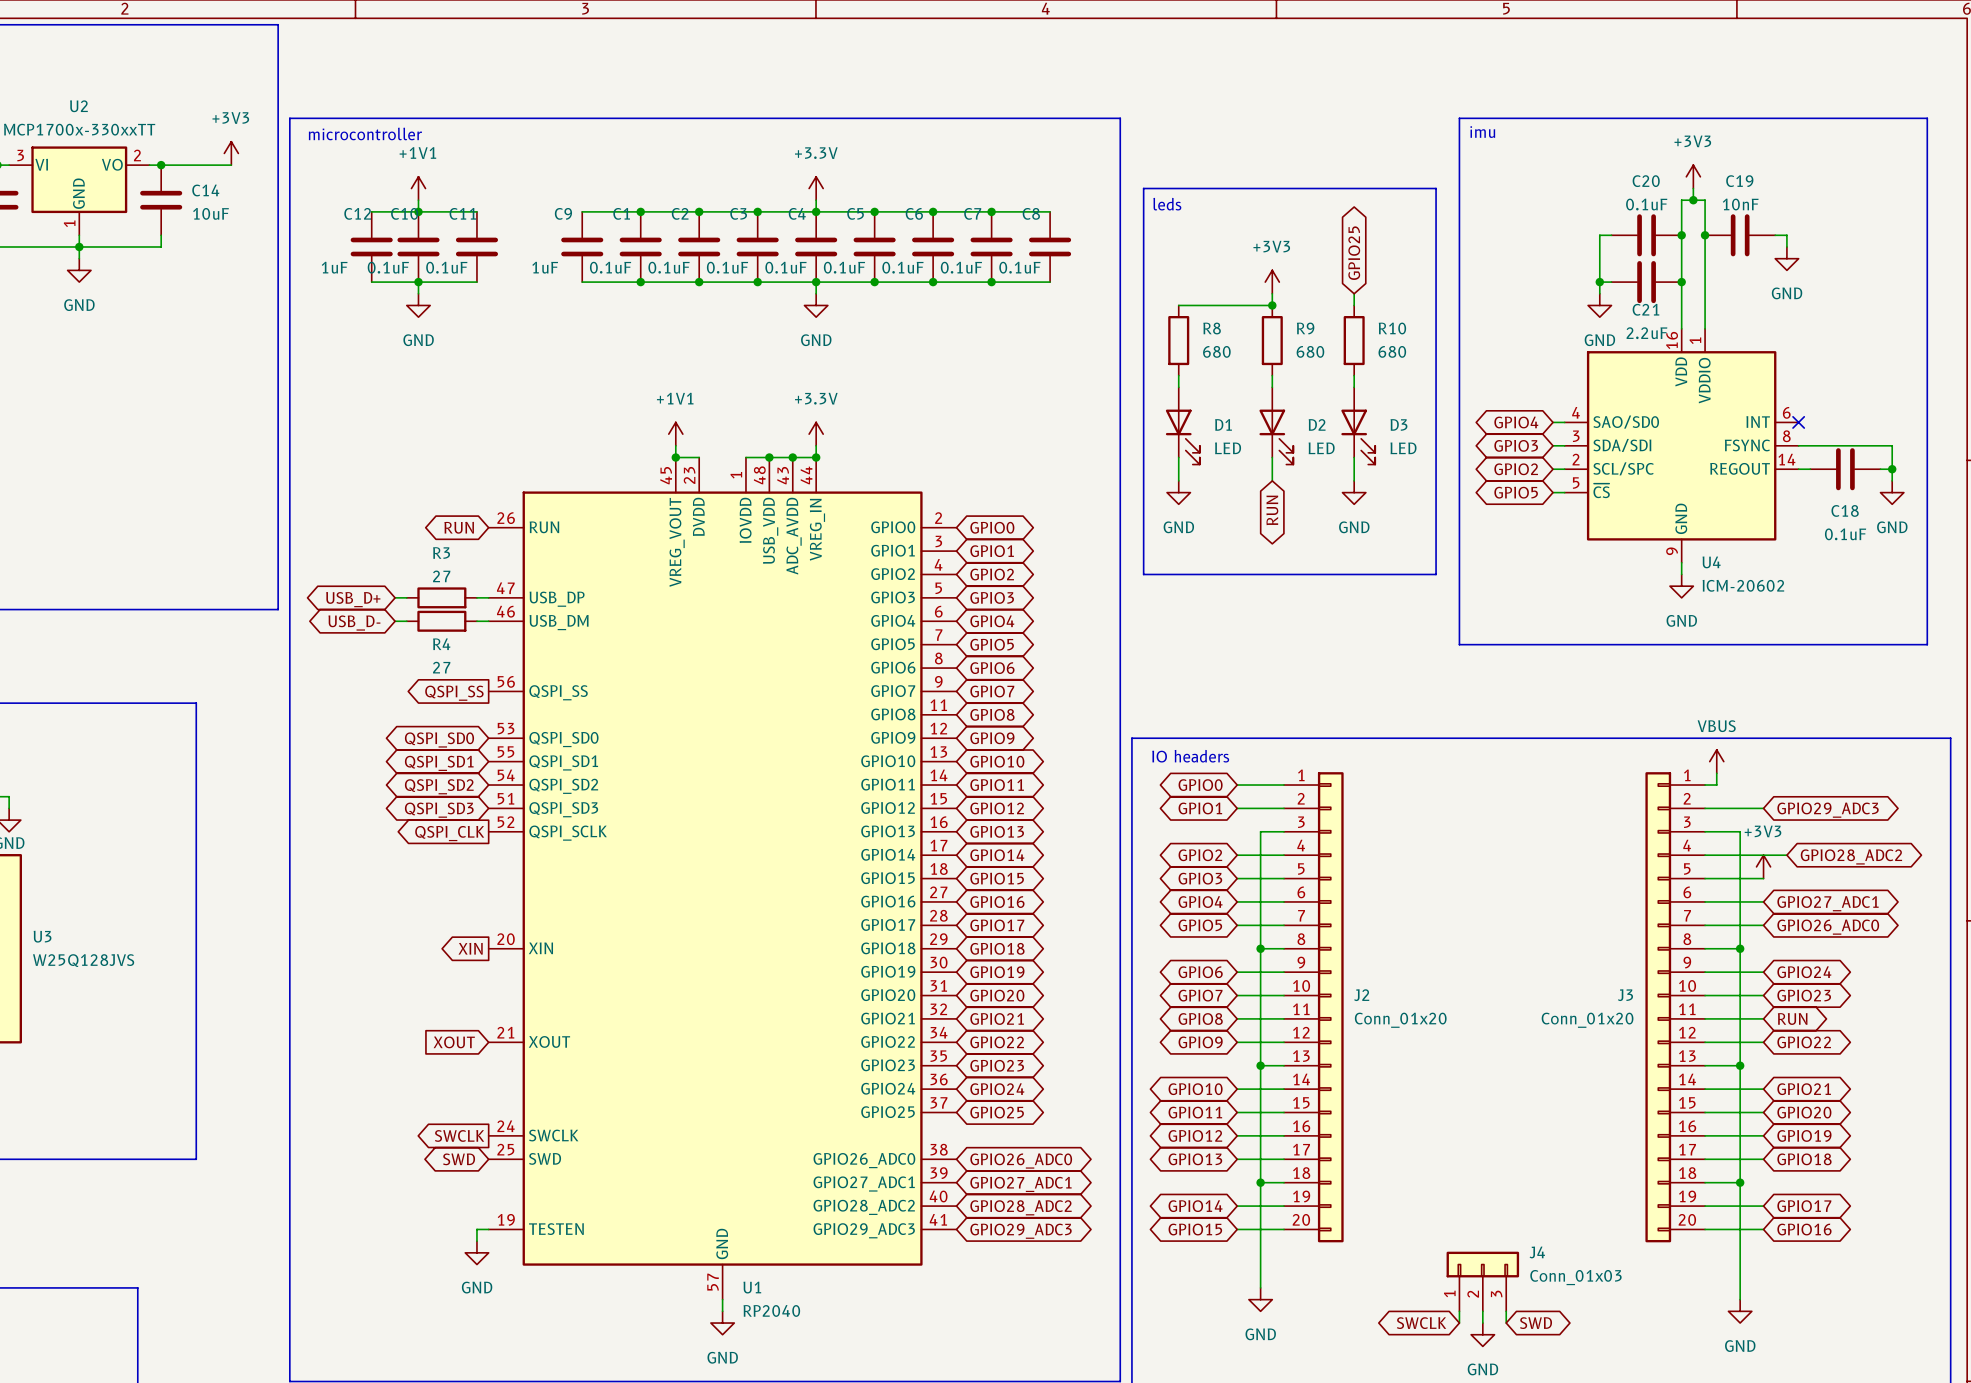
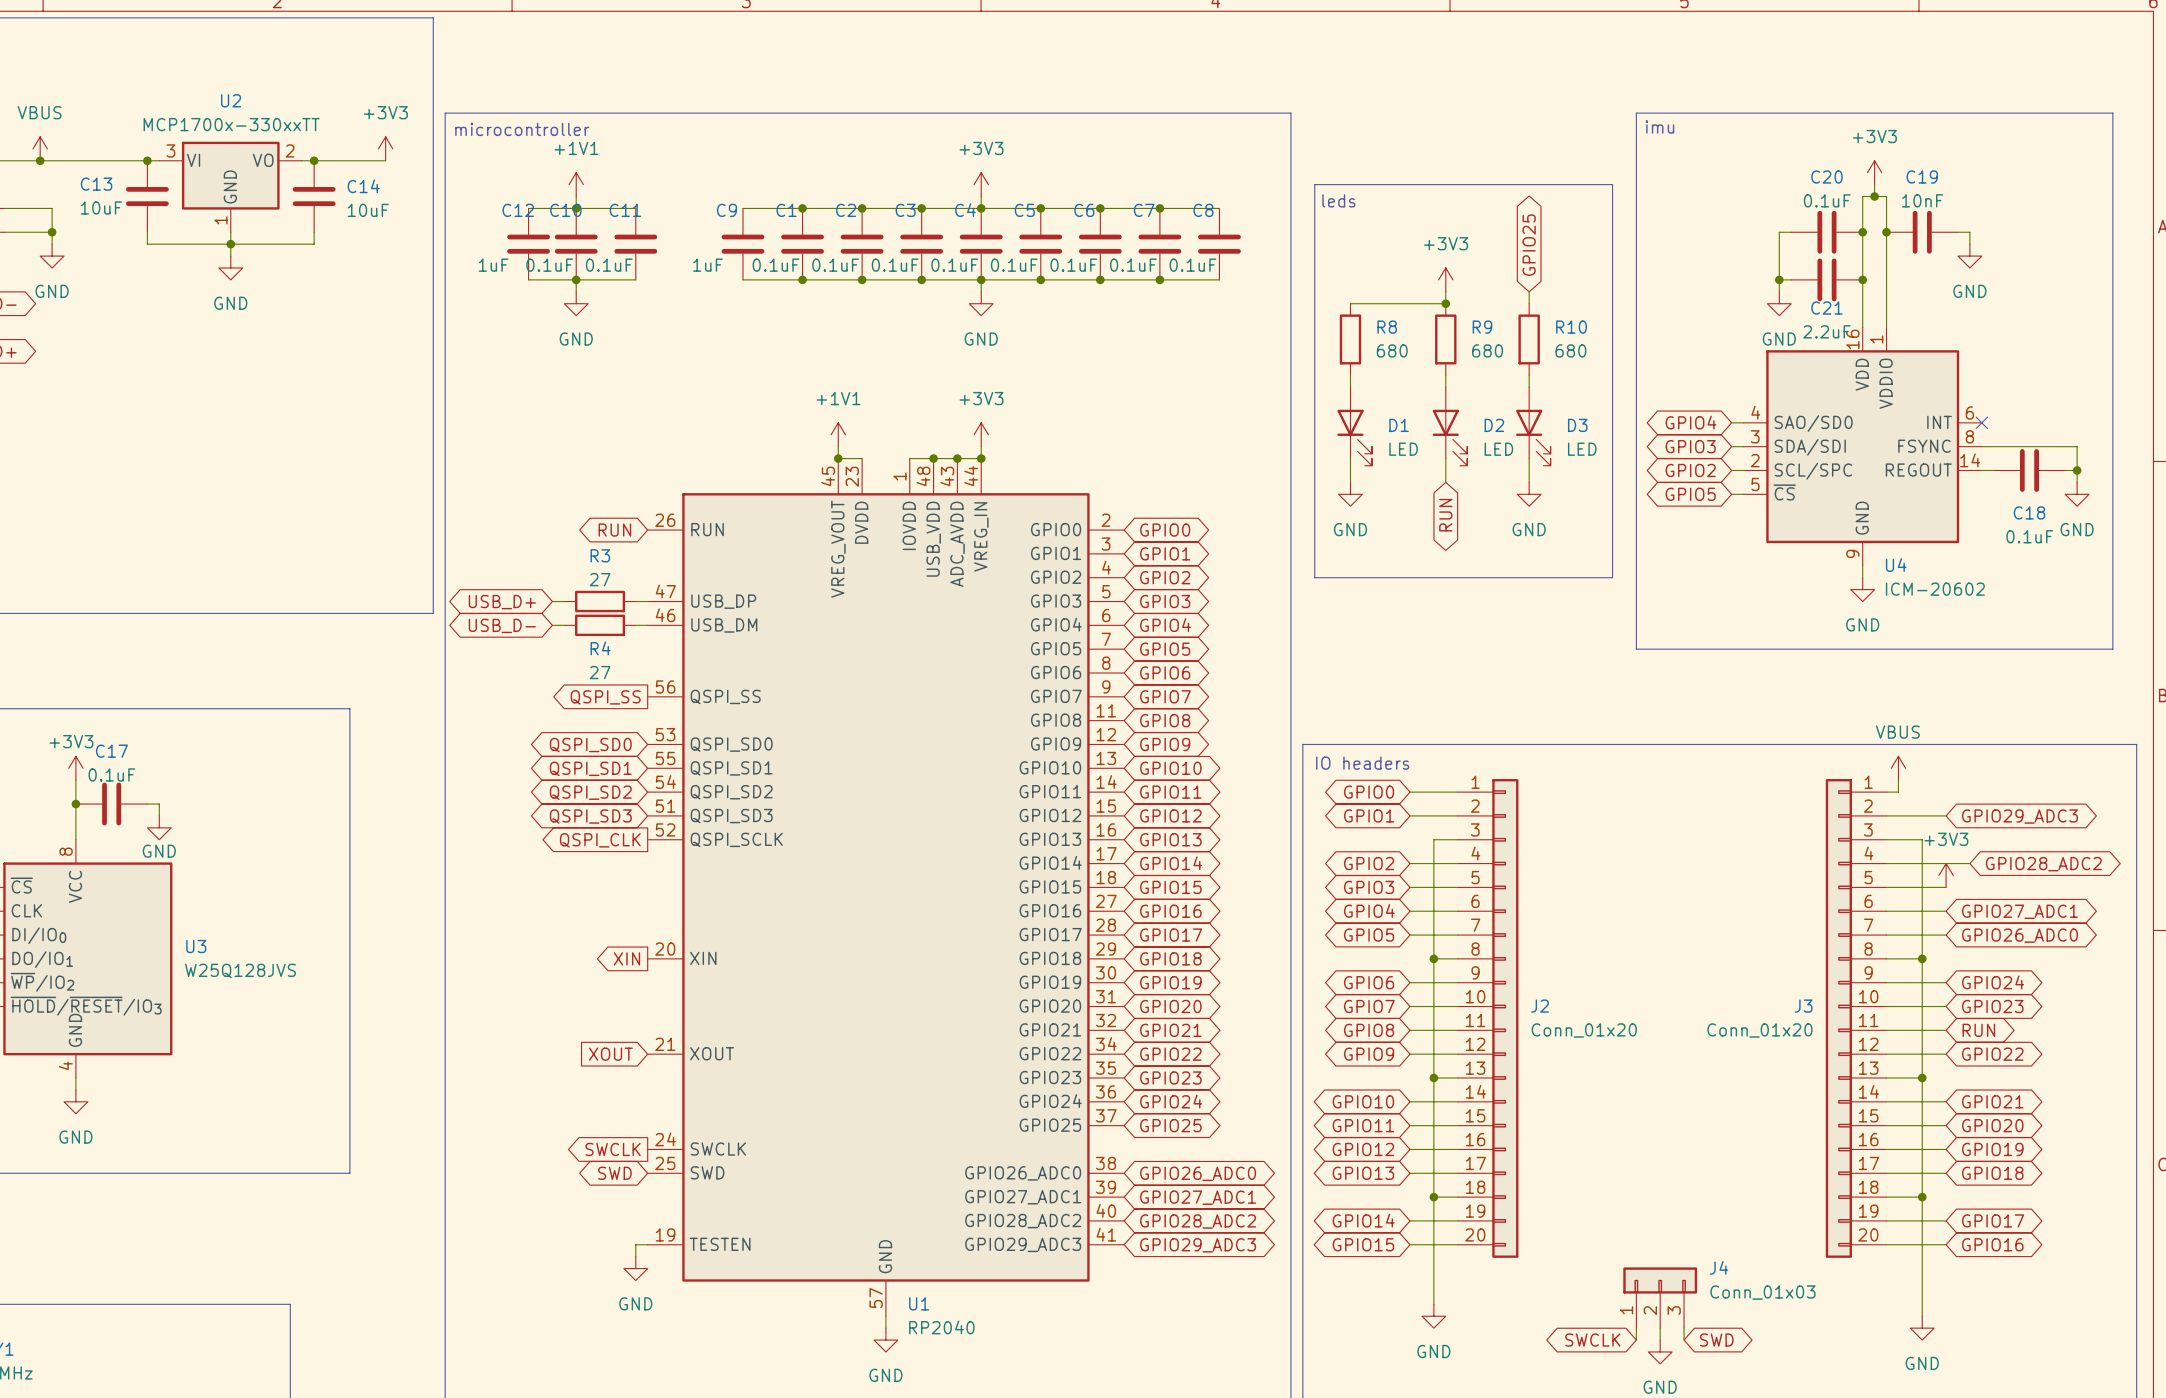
power symbol: +3.3V (816, 188) -> +3V3 (981, 184)
power symbol: +3.3V (816, 434) -> +3V3 (981, 434)

